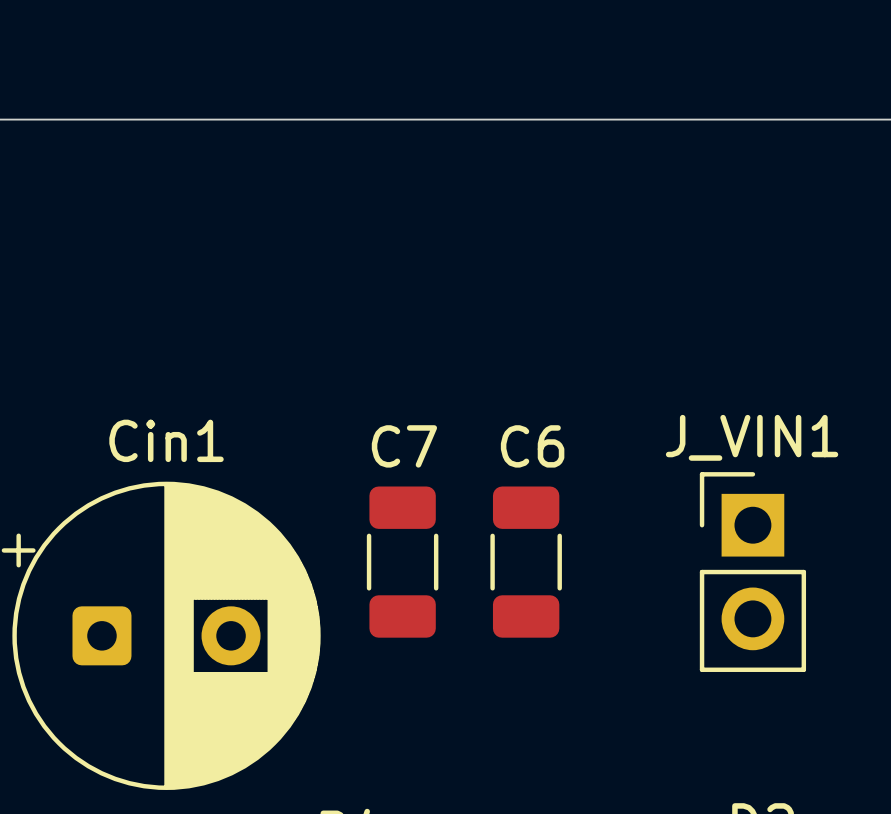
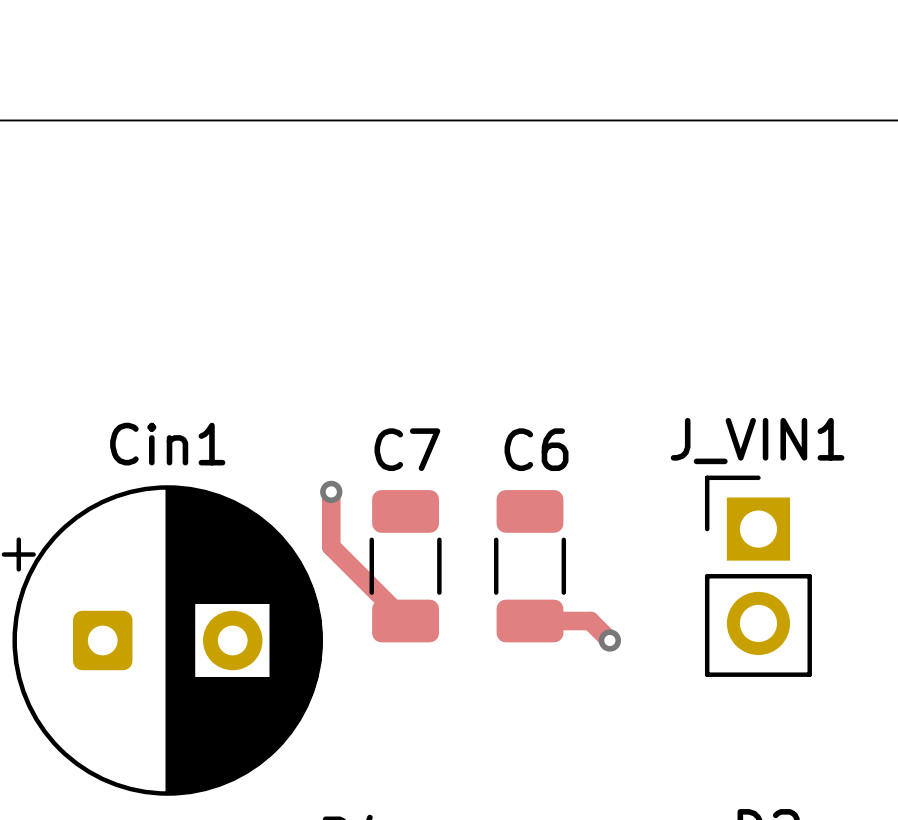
track: none -> (331, 491) (331, 546) (405, 621)
via: none -> (331, 491)
track: none -> (530, 621) (590, 621) (609, 640)
via: none -> (609, 640)

